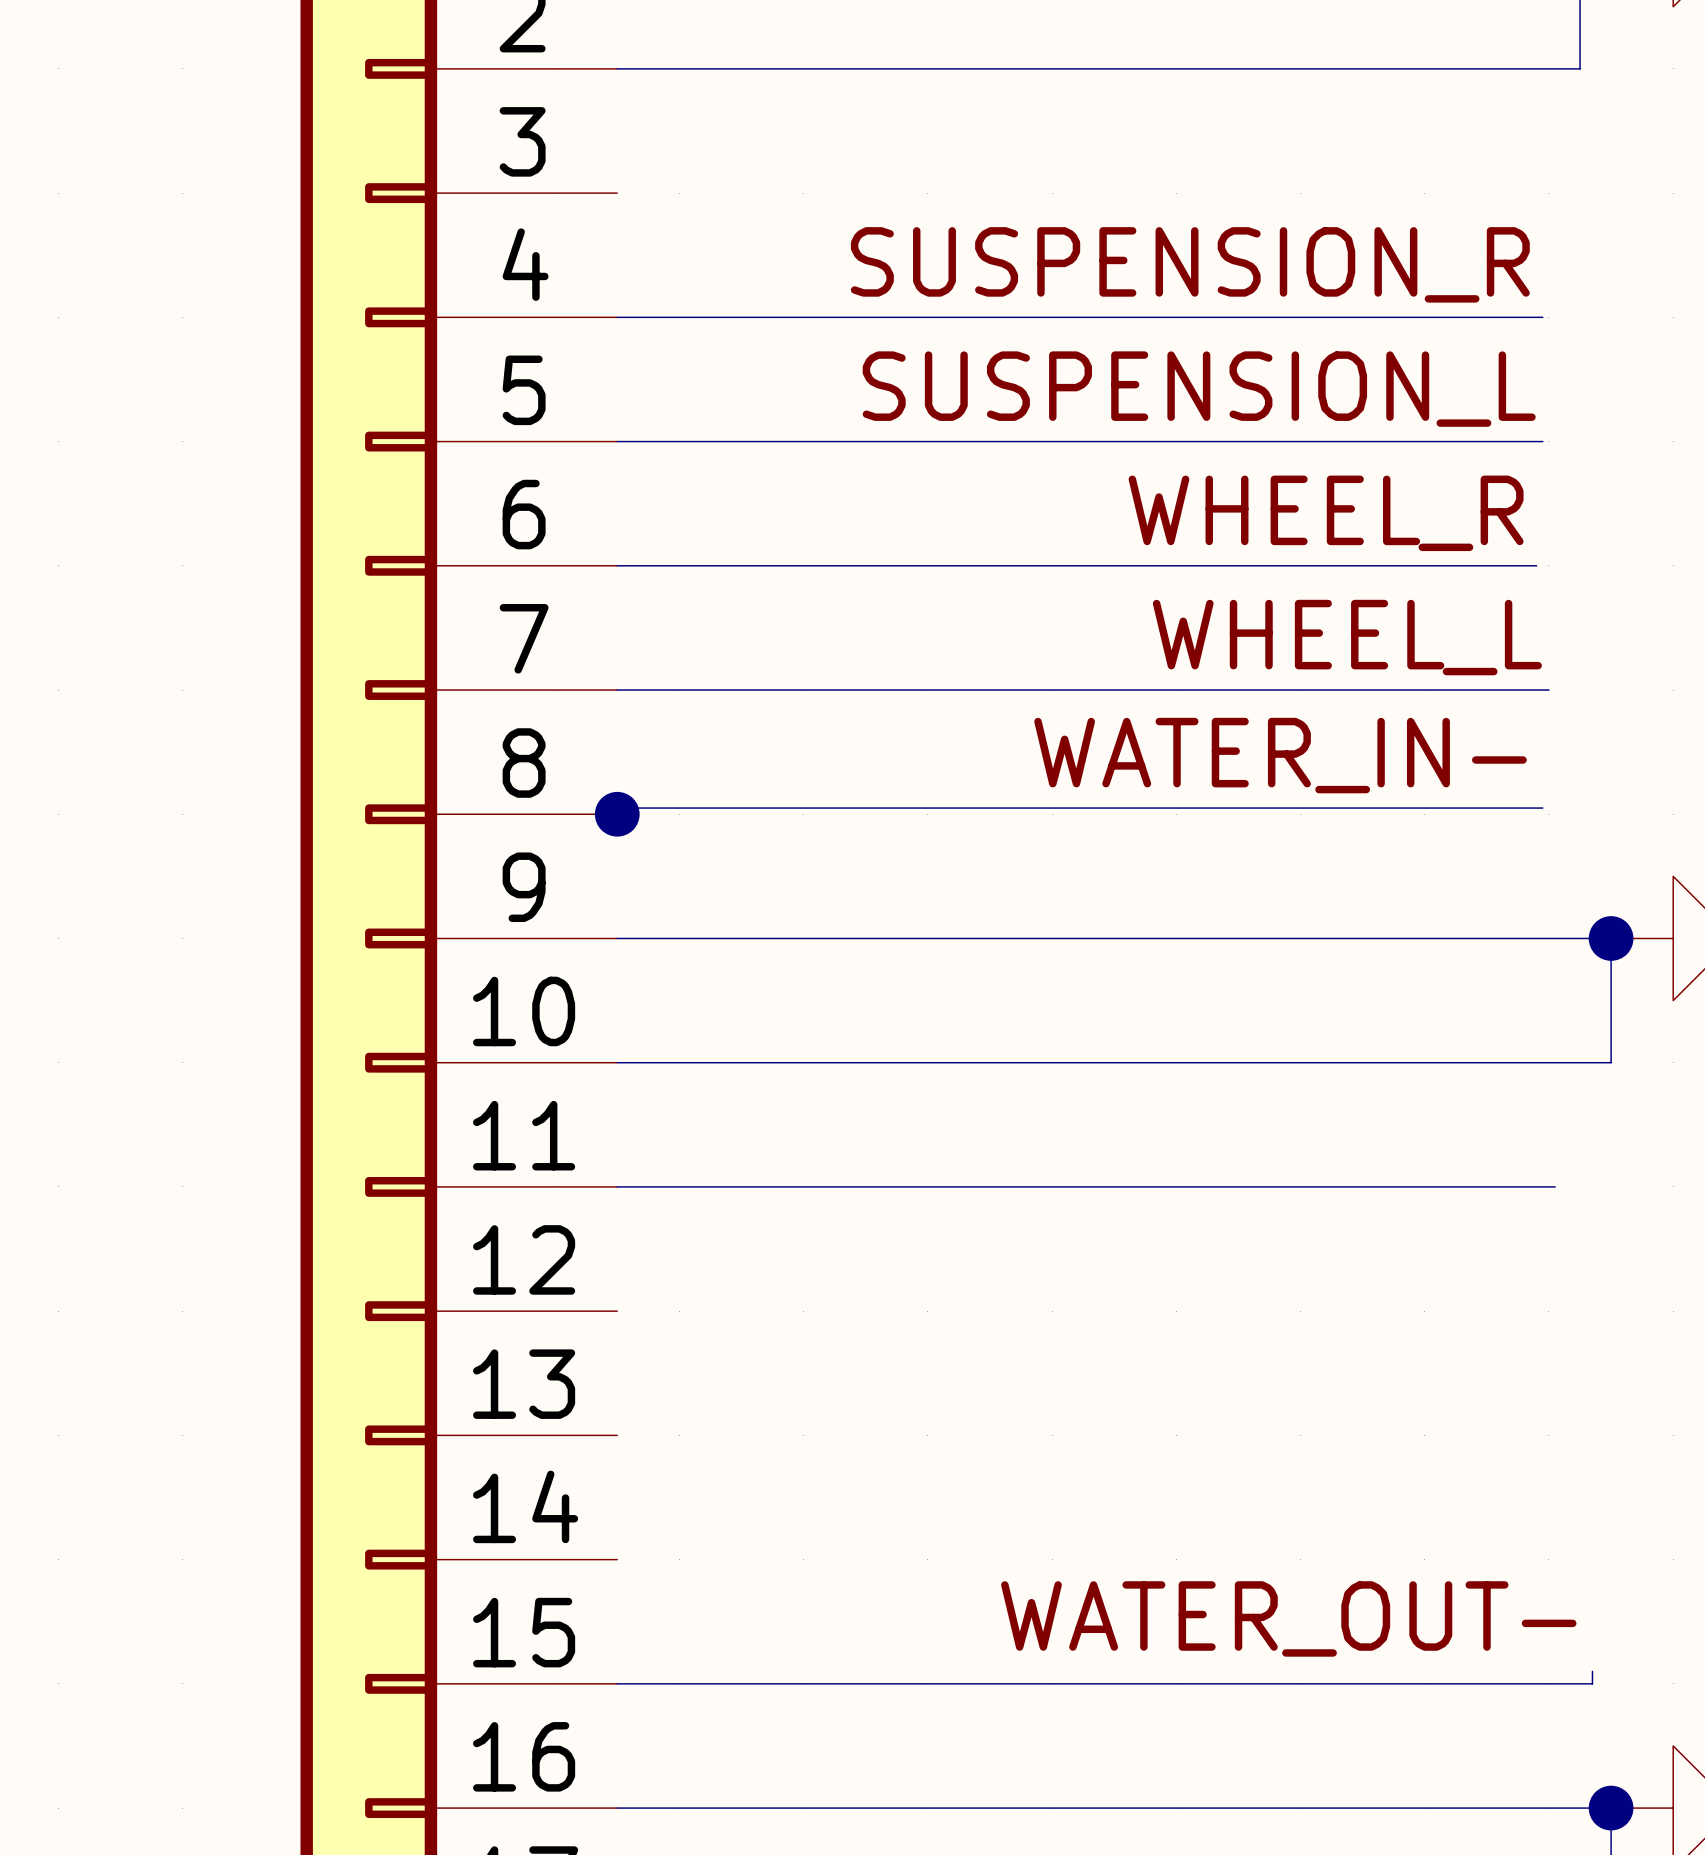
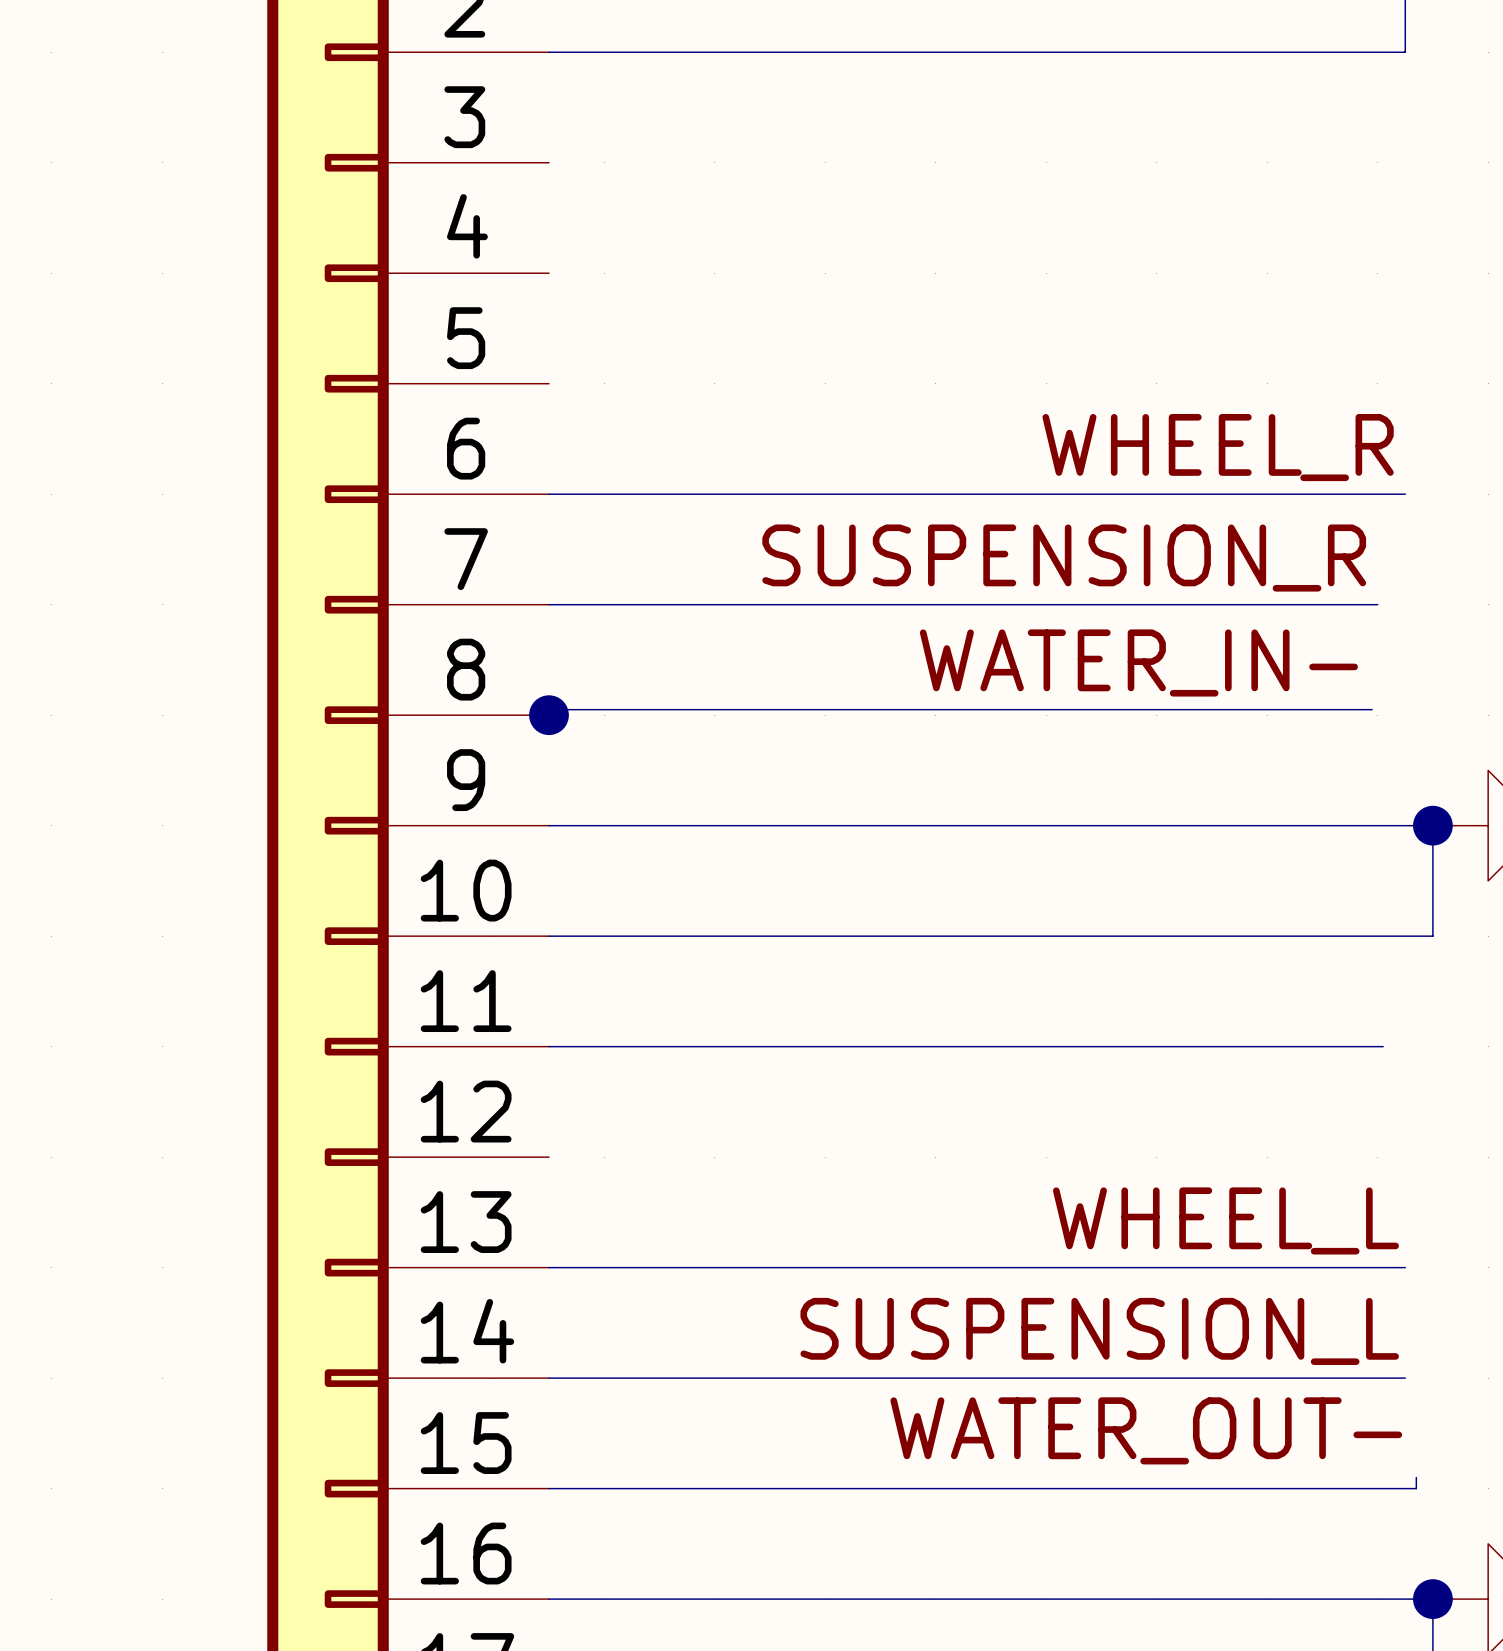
label: SUSPENSION_R (1190, 264) -> none
wire: (617, 317) (1542, 317) -> none
label position: SUSPENSION_L (1199, 389) -> SUSPENSION_L (1099, 1331)
wire: (617, 441) (1542, 441) -> none
label position: WHEEL_R (1326, 513) -> WHEEL_R (1218, 447)
wire: none -> (1366, 494) (1405, 494)
label: WHEEL_L (1347, 637) -> SUSPENSION_R (1064, 558)
label: none -> WHEEL_L (1225, 1220)
wire: none -> (549, 1267) (1405, 1267)
wire: none -> (549, 1378) (1405, 1378)

